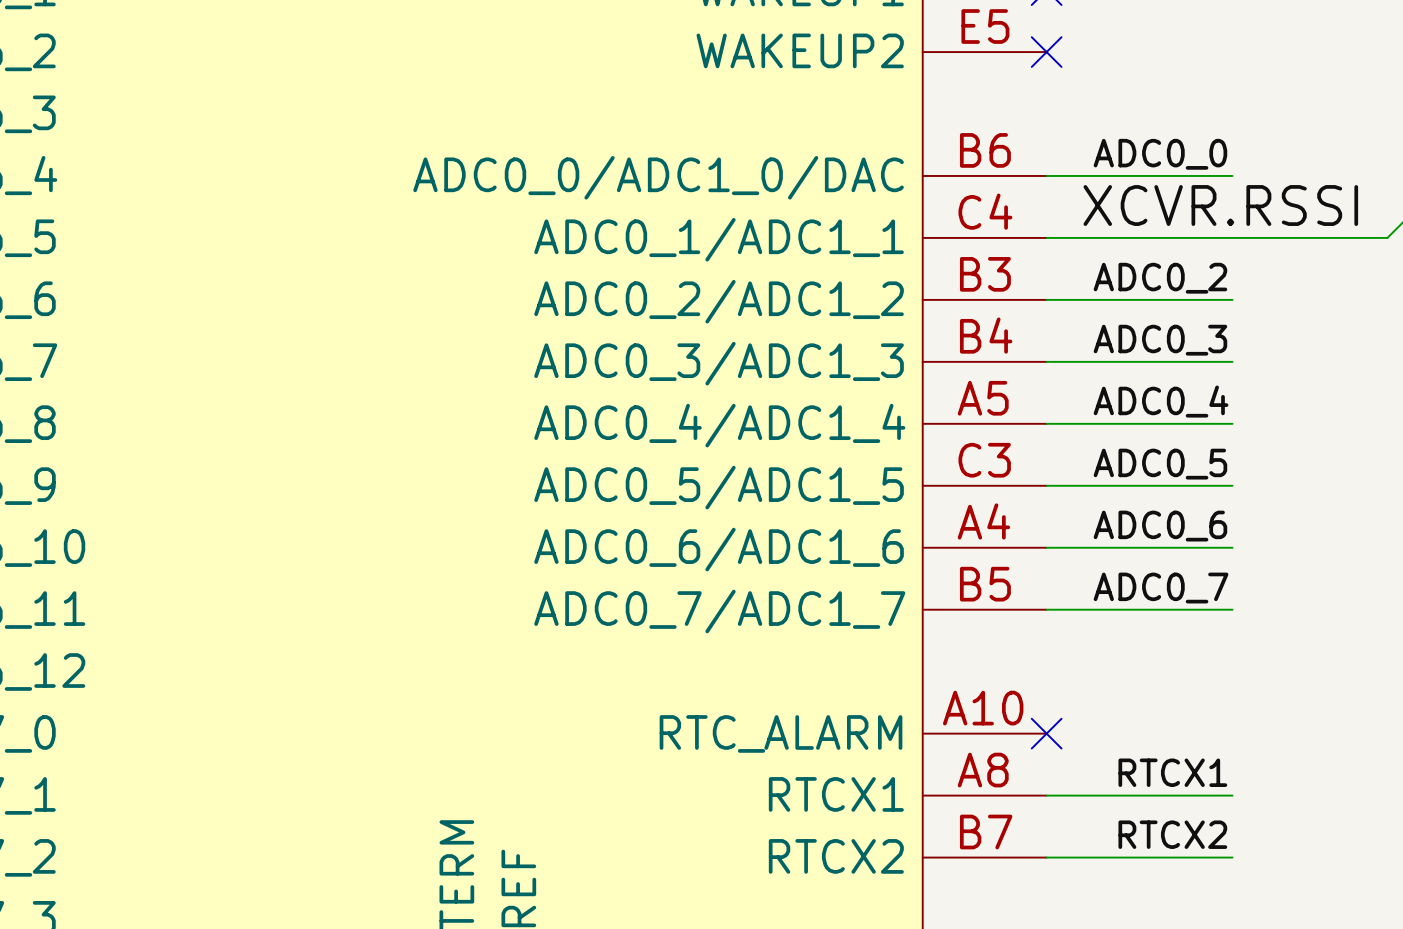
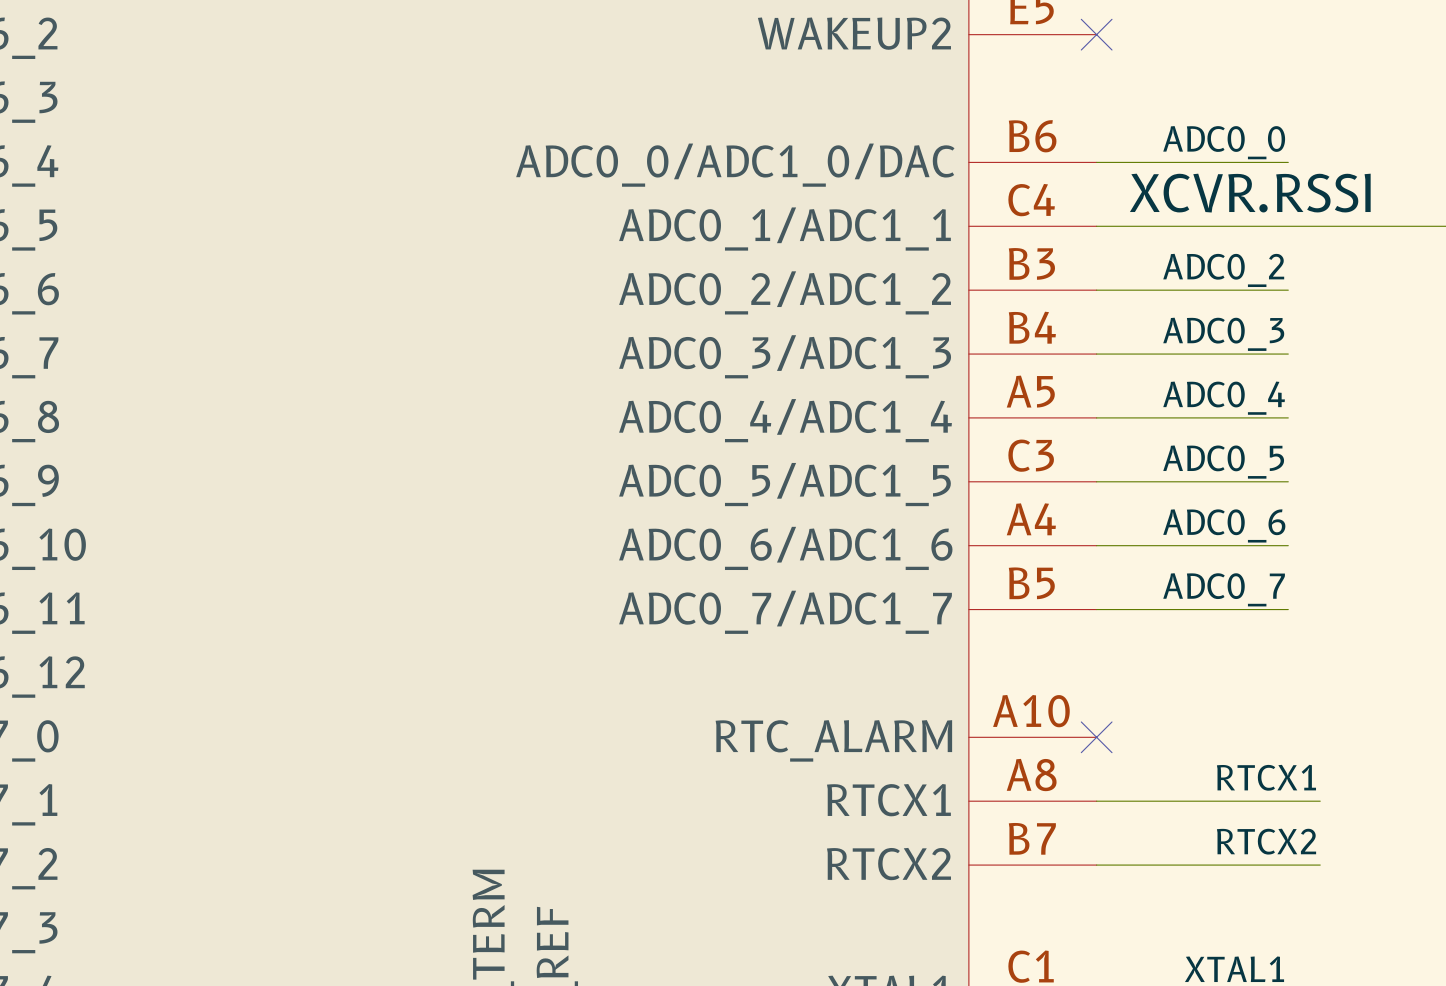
label position: RTCX1 (1172, 772) -> RTCX1 (1266, 777)
wire: none -> (1288, 801) (1320, 801)
label position: RTCX2 (1172, 834) -> RTCX2 (1266, 841)
wire: none -> (1288, 865) (1320, 865)

